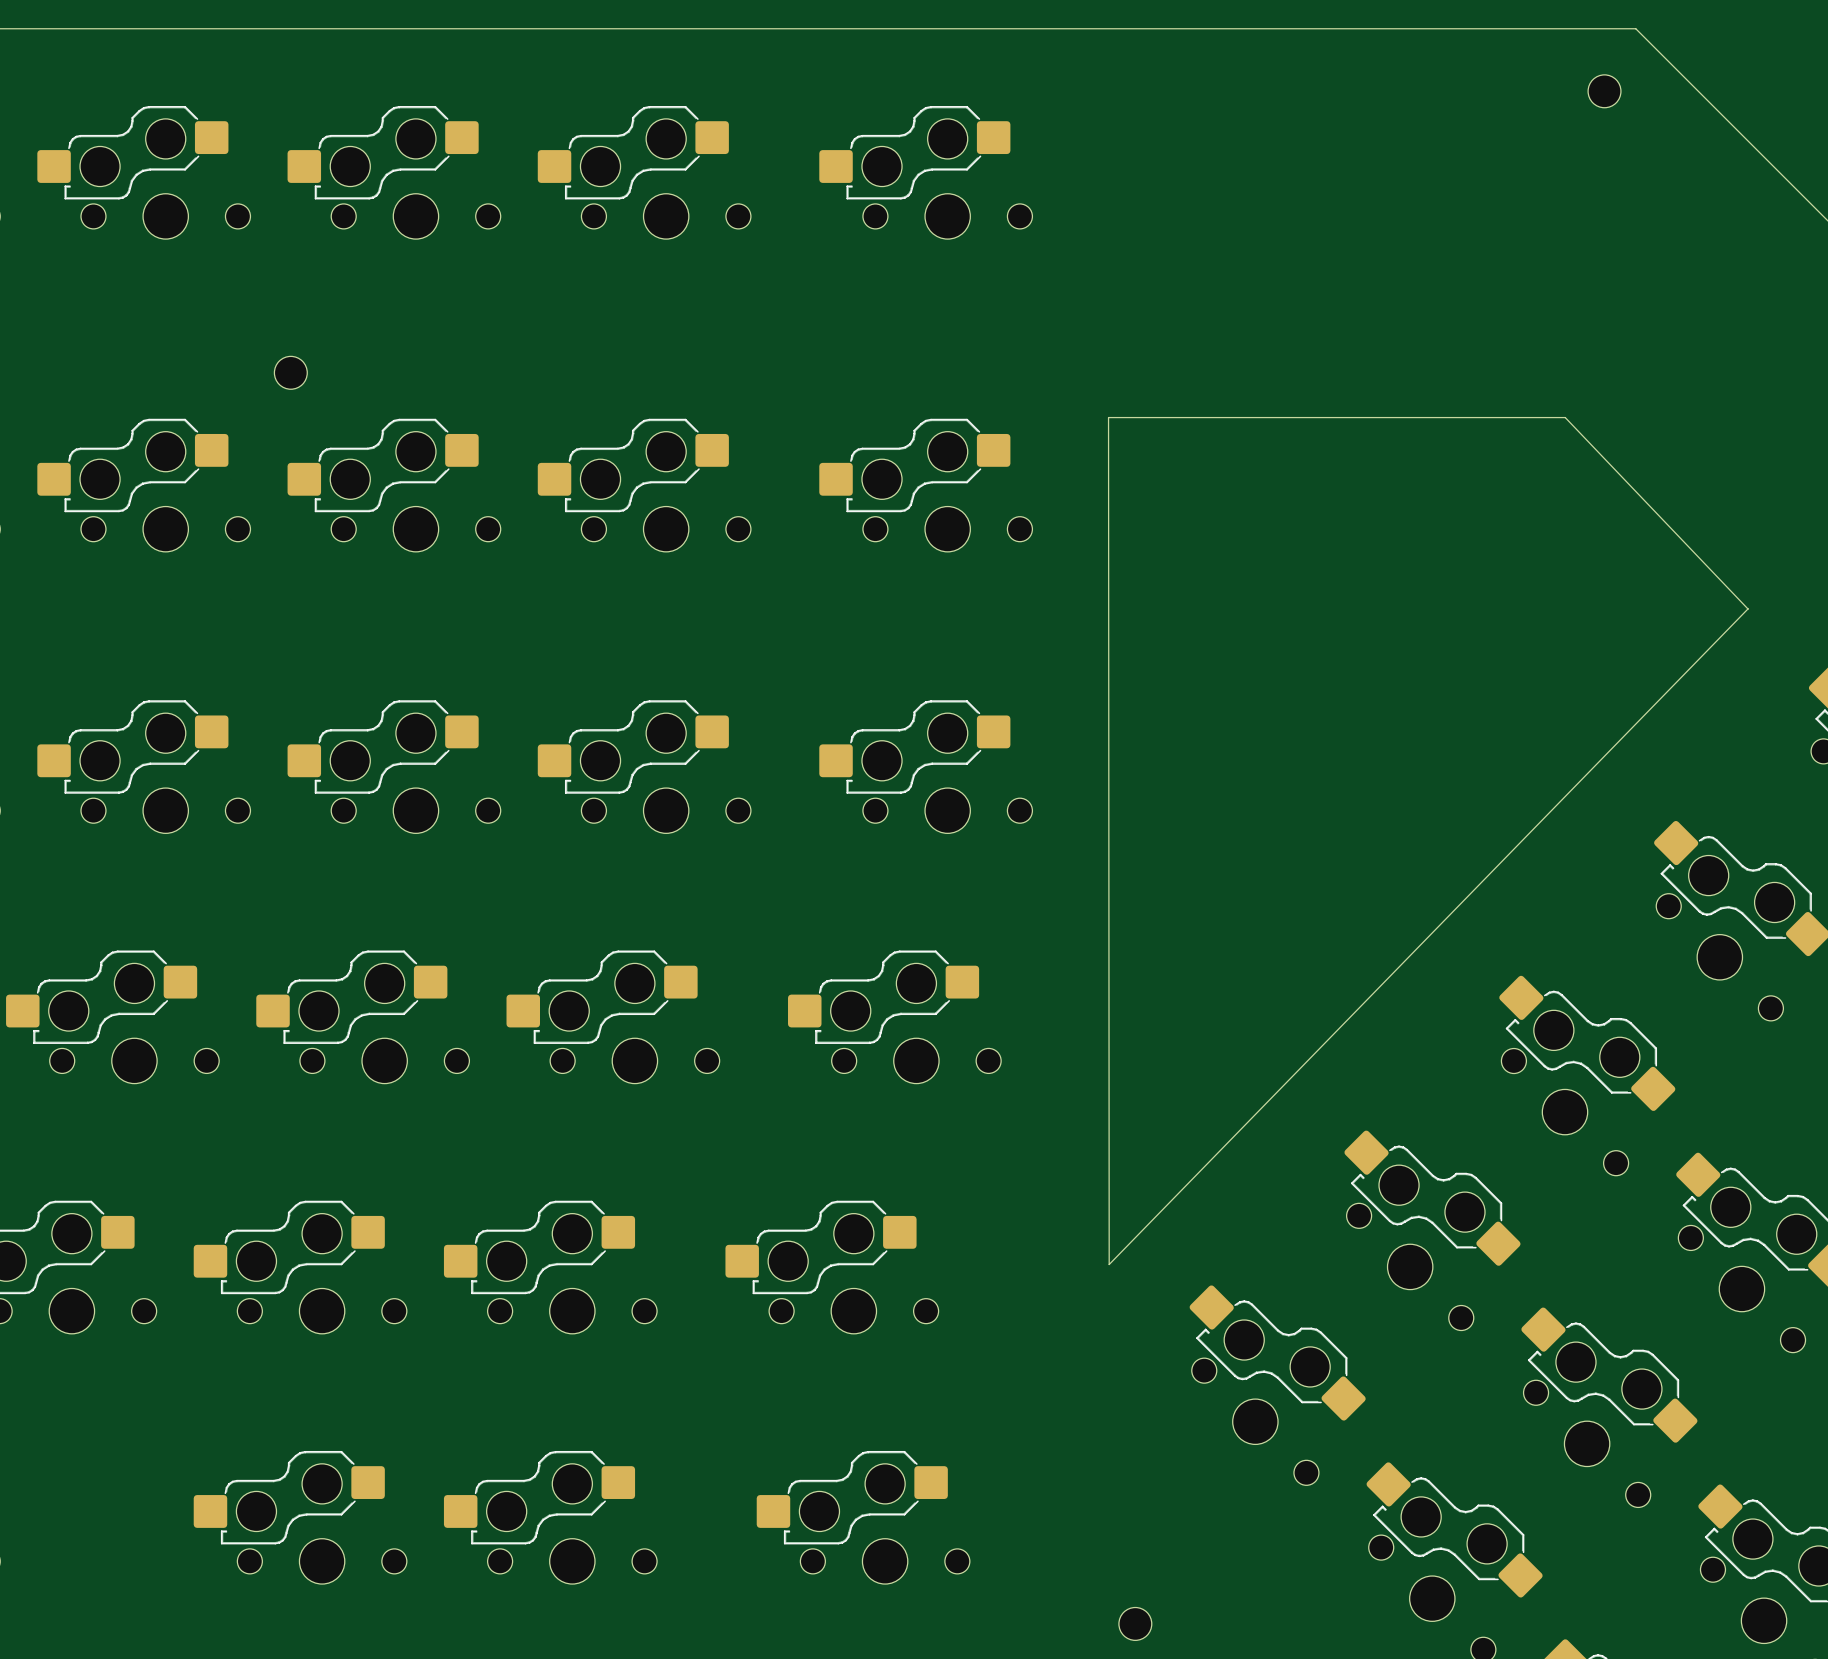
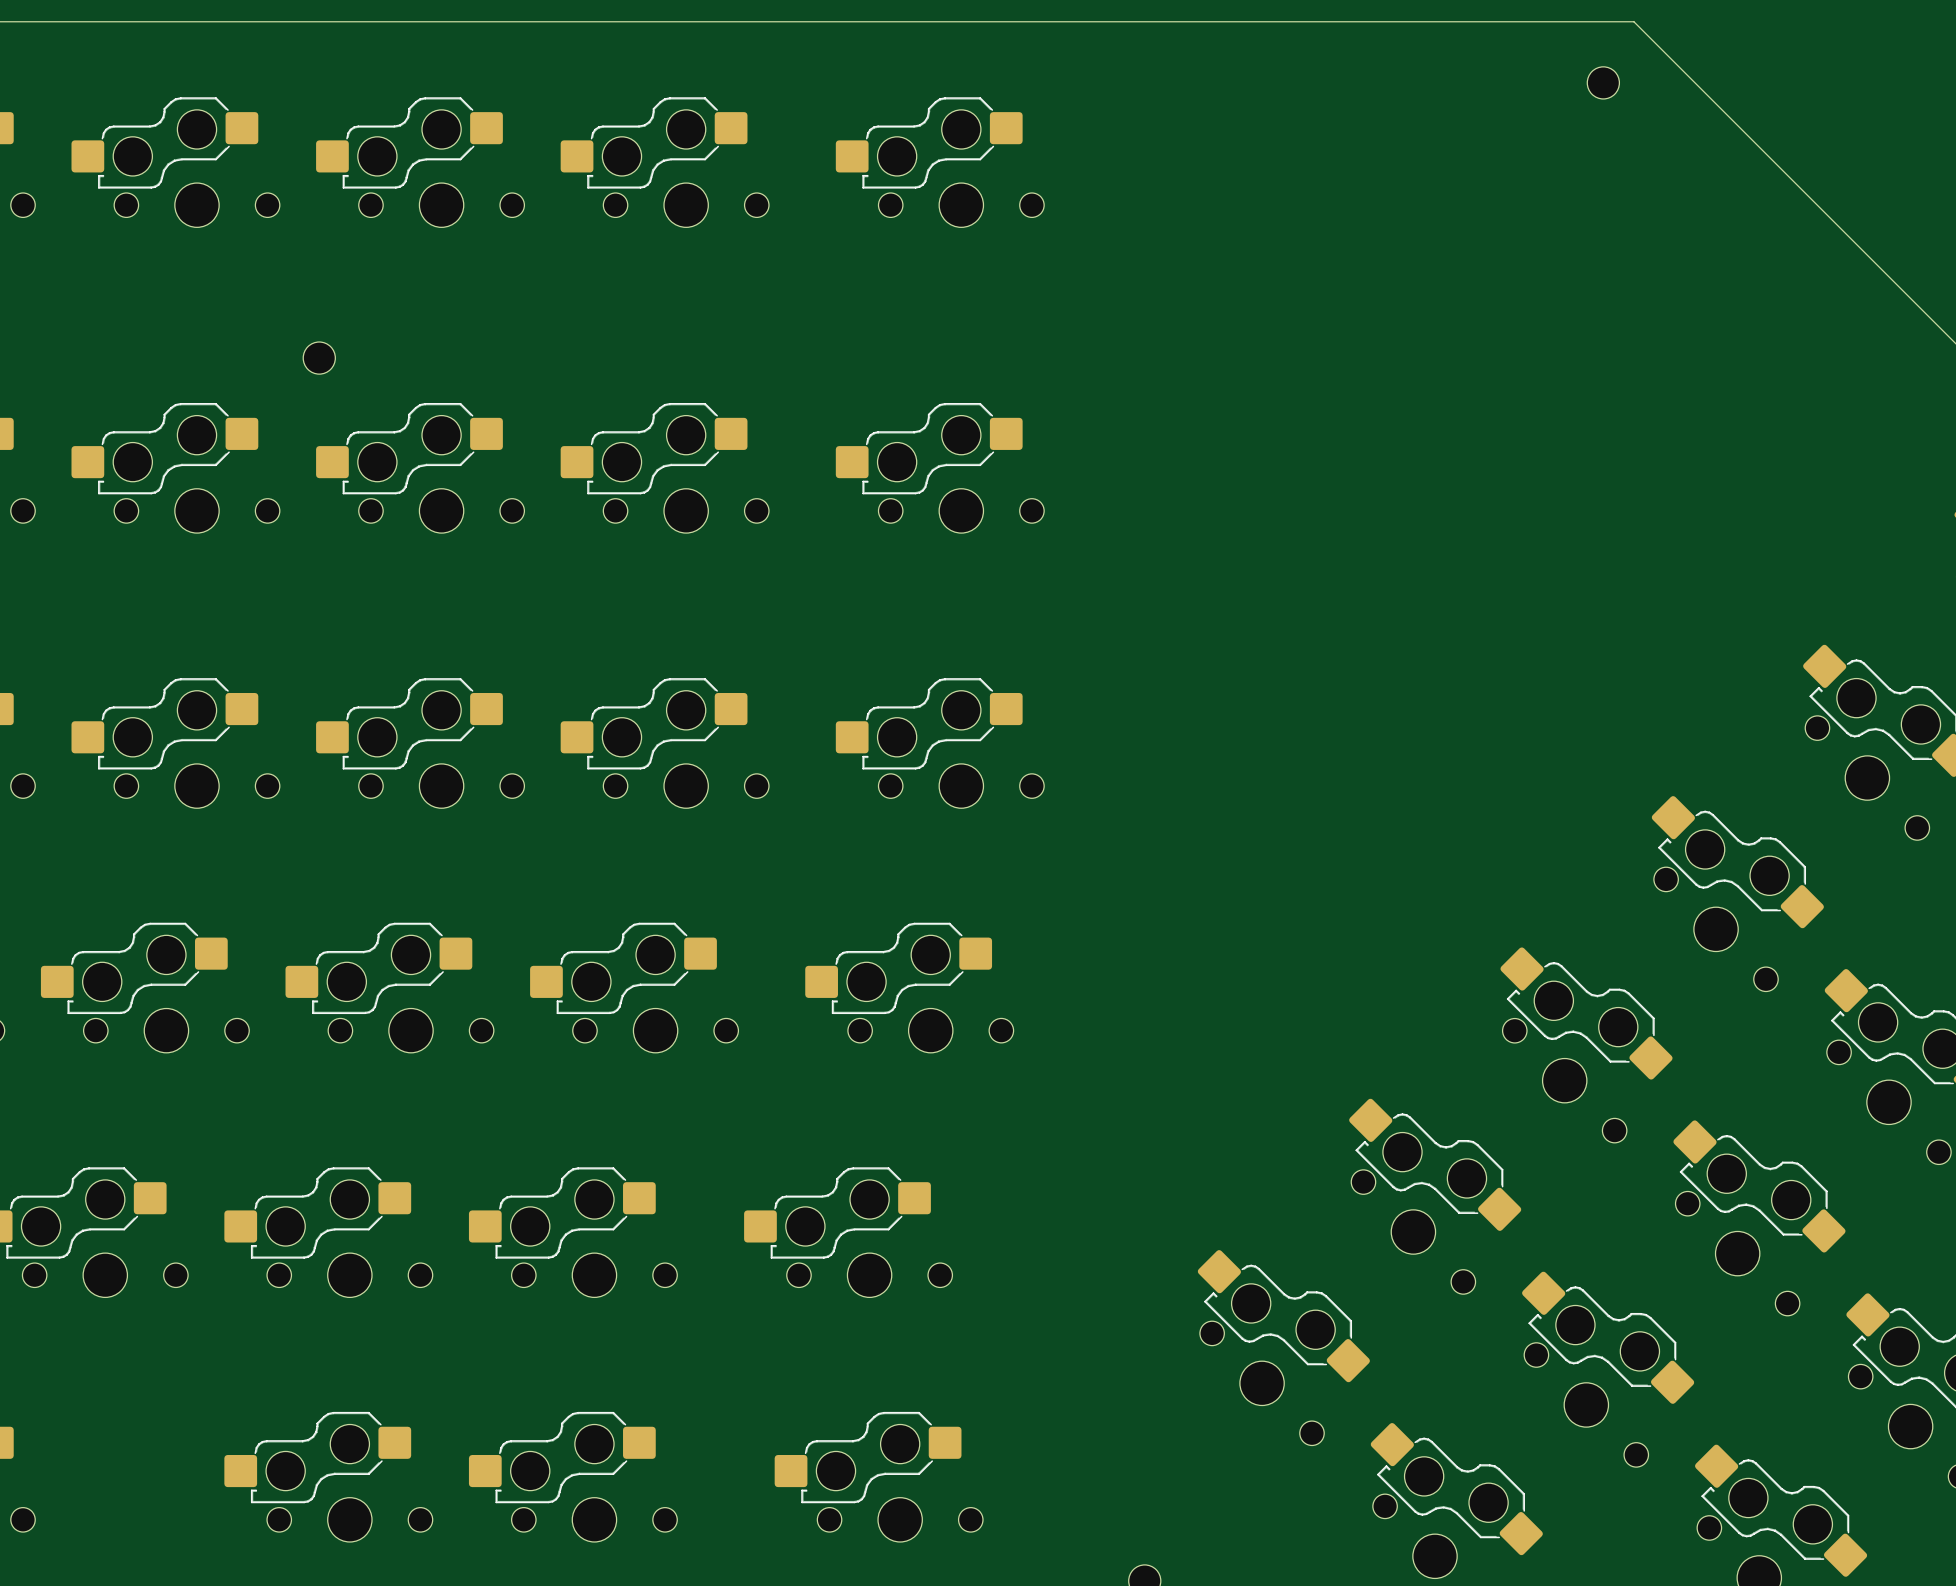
board edge: (1565, 417) (1747, 608) (1109, 1264) (1108, 417) (1565, 417) -> none

